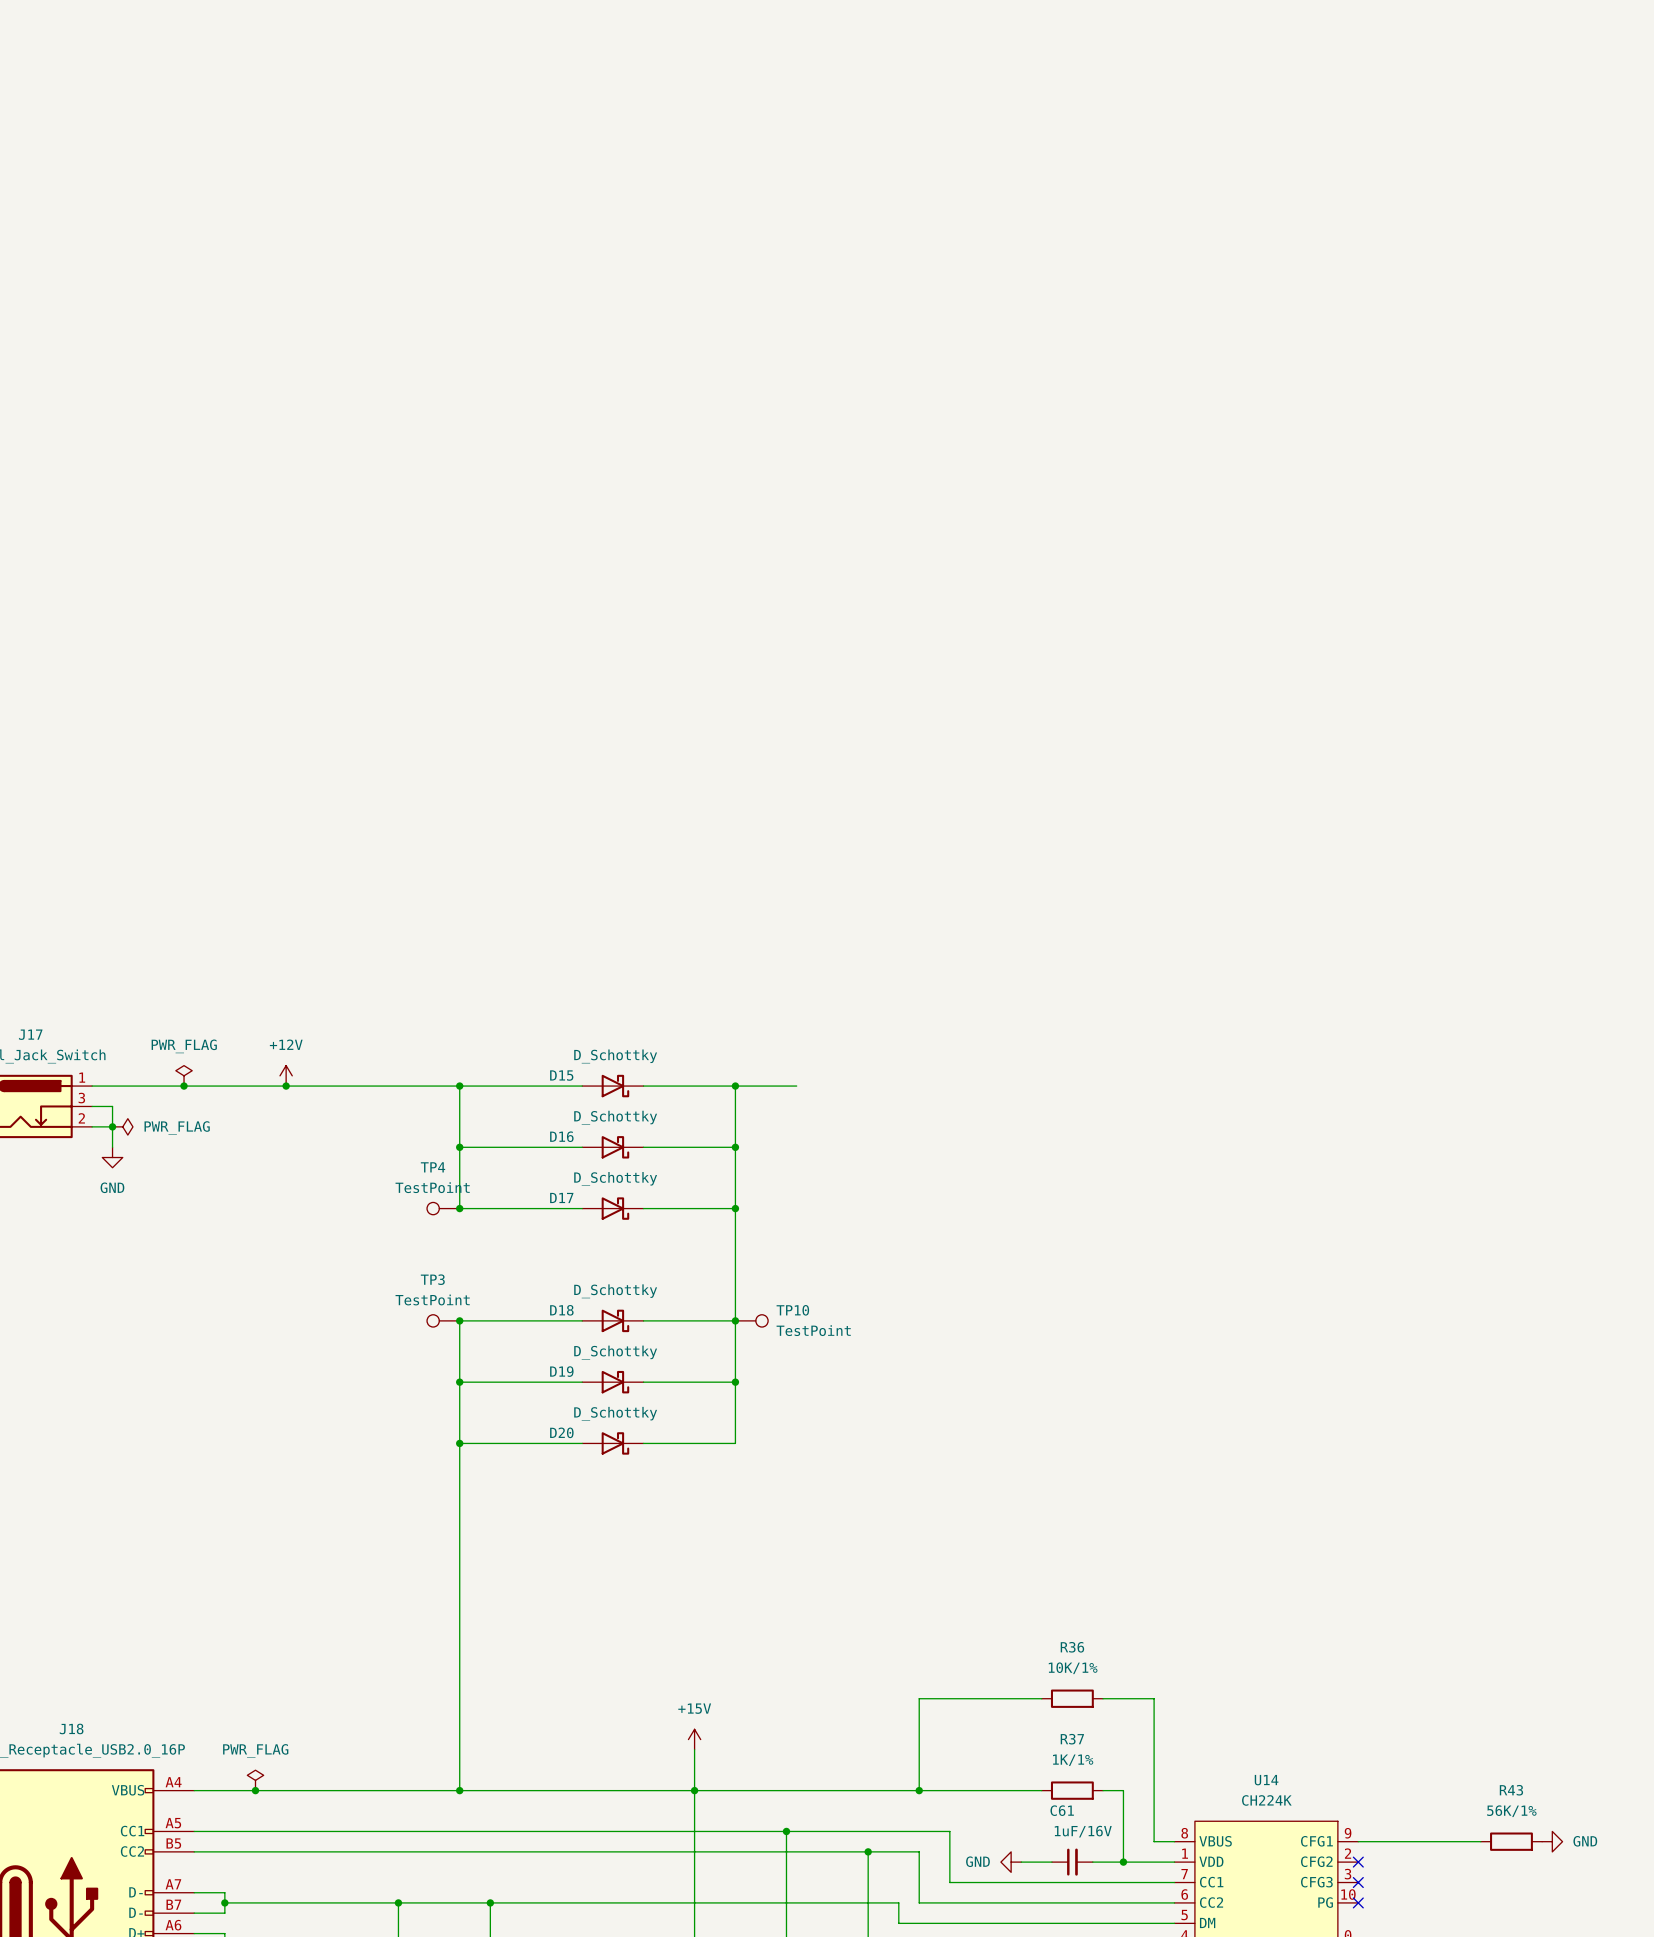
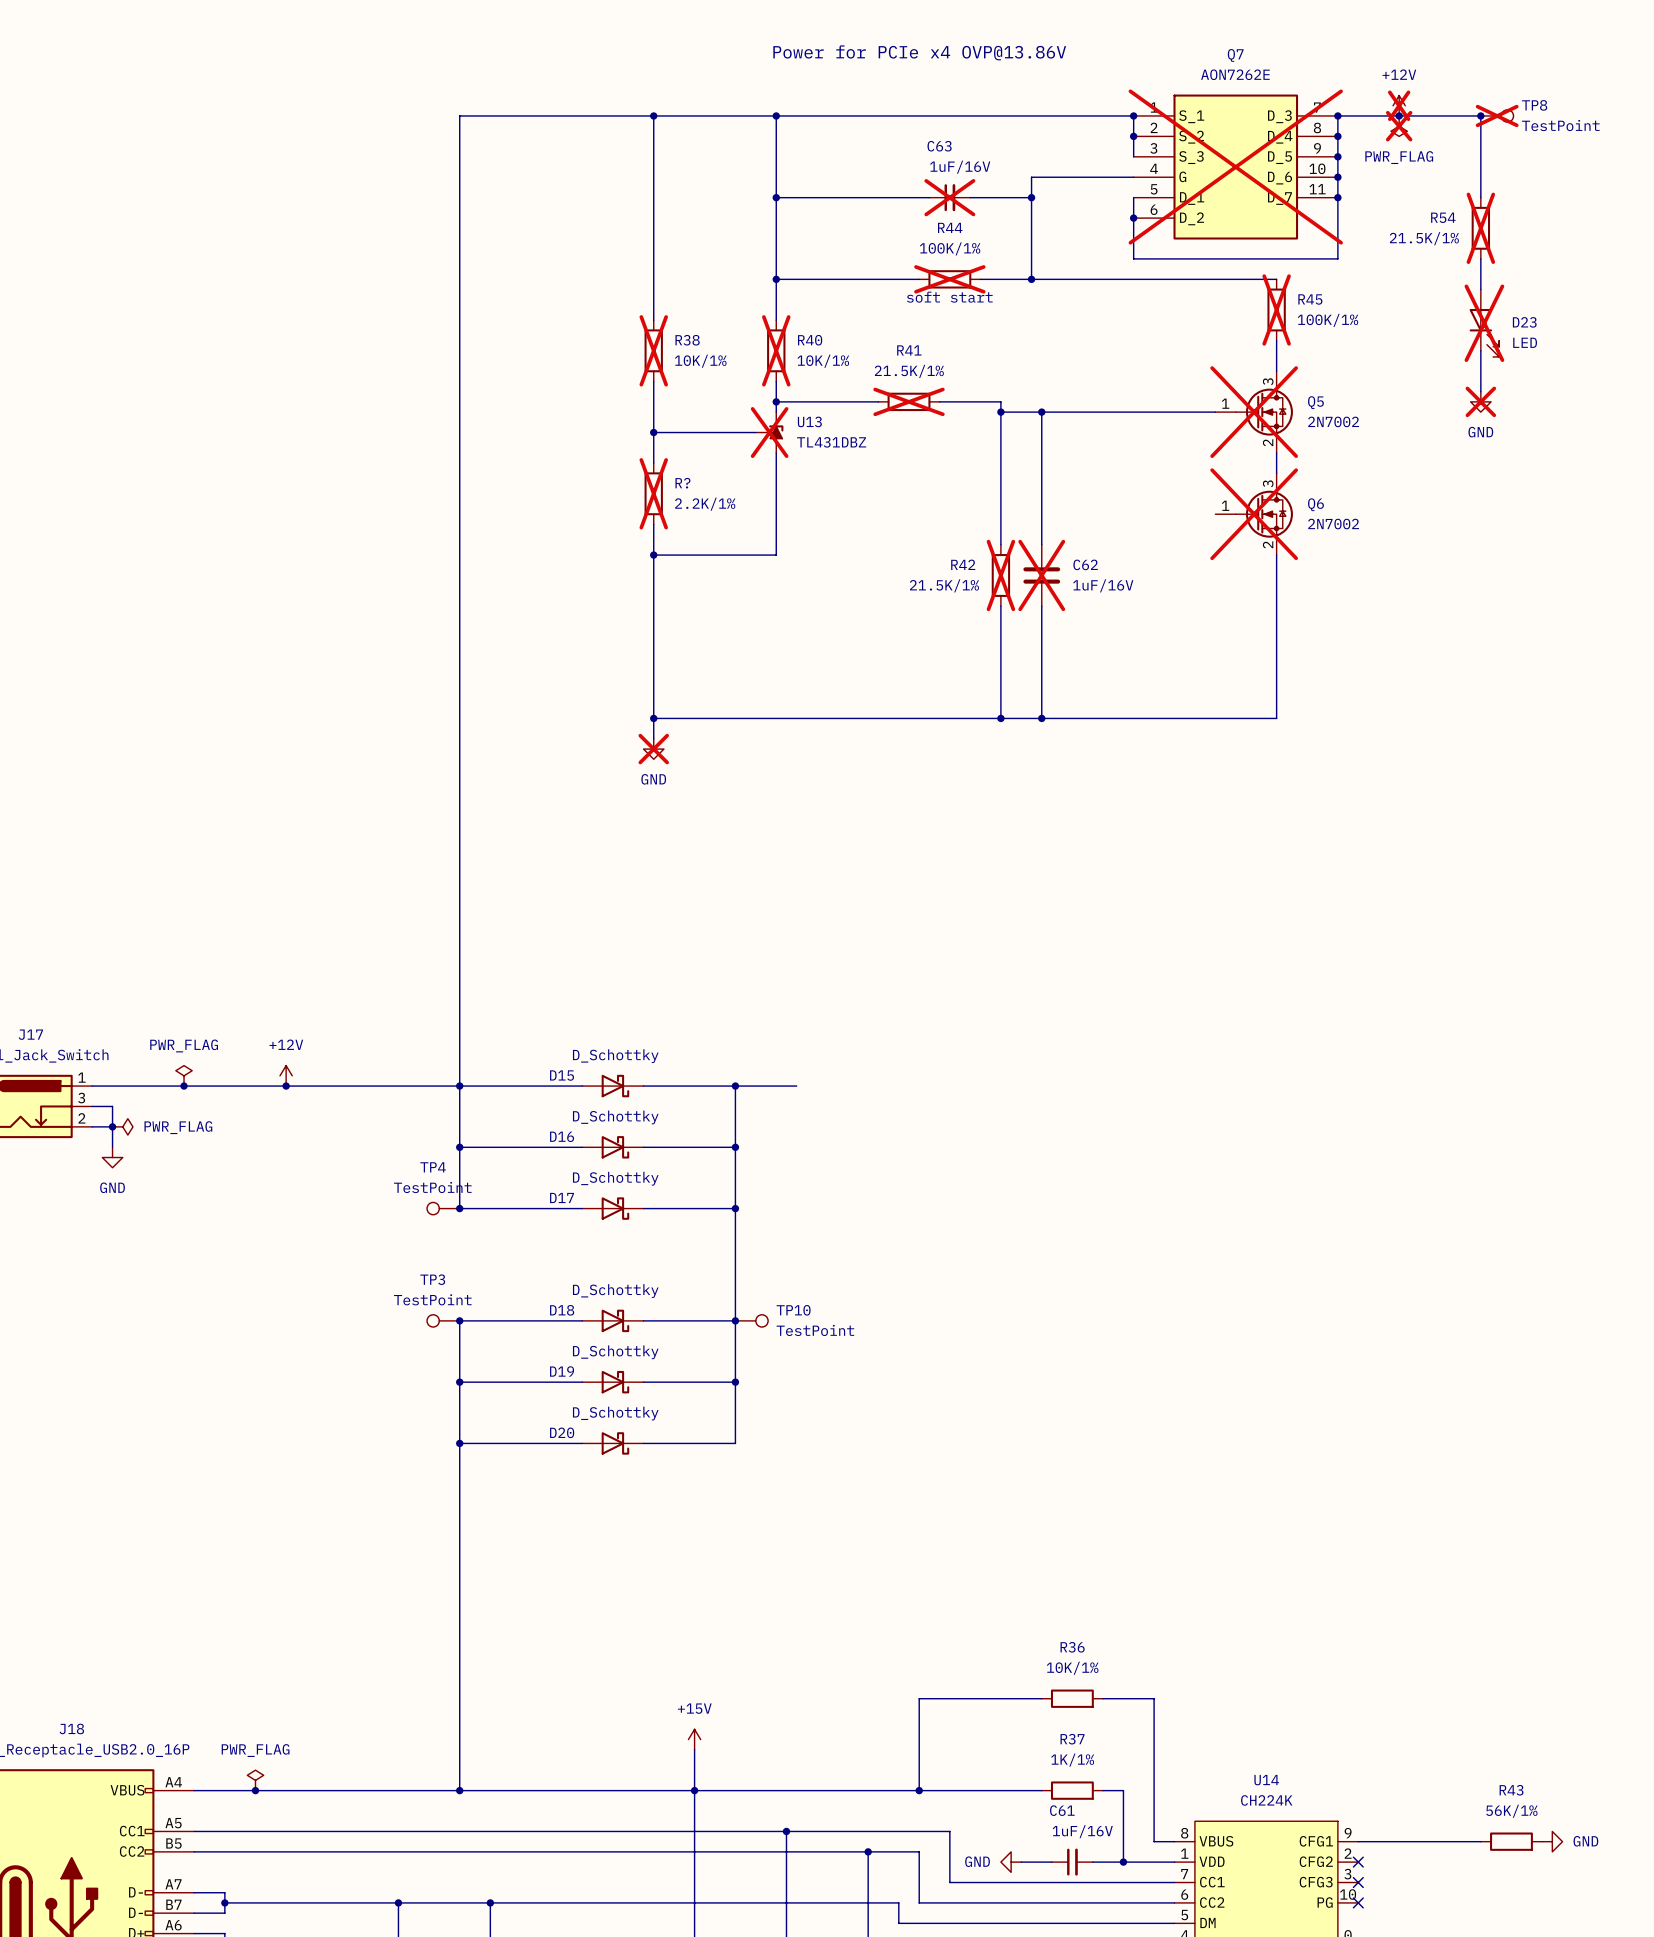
text: none -> Power for PCIe x4 OVP@13.86V (919, 52)
power symbol: none -> +12V (1399, 105)
wire: none -> (653, 115) (653, 320)
junction: none -> (653, 115)
wire: none -> (776, 115) (776, 320)
junction: none -> (776, 115)
junction: none -> (1133, 115)
junction: none -> (1337, 115)
junction: none -> (1399, 115)
junction: none -> (1480, 115)
TP8: none -> TestPoint (1497, 115)
power symbol: none -> PWR_FLAG (1399, 126)
junction: none -> (1133, 136)
junction: none -> (1337, 136)
wire: none -> (1133, 156) (1133, 115) (459, 115) (459, 1086)
junction: none -> (1337, 156)
Q7: none -> AON7262E (1235, 167)
wire: none -> (1133, 177) (1031, 177) (1031, 279)
junction: none -> (1337, 177)
wire: none -> (776, 197) (929, 197)
junction: none -> (776, 197)
C63: none -> 1uF/16V (949, 197)
wire: none -> (970, 197) (1031, 197)
junction: none -> (1031, 197)
wire: none -> (1133, 197) (1133, 258) (1337, 258) (1337, 115) (1480, 115) (1480, 197)
junction: none -> (1337, 197)
junction: none -> (1133, 218)
R54: none -> 21.5K/1% (1480, 228)
wire: none -> (1480, 258) (1480, 289)
wire: none -> (776, 279) (919, 279)
junction: none -> (776, 279)
R44: none -> 100K/1% (949, 279)
wire: none -> (980, 279) (1276, 279)
junction: none -> (1031, 279)
text: none -> soft start (949, 297)
R45: none -> 100K/1% (1276, 309)
D23: none -> LED (1484, 323)
wire: none -> (1276, 340) (1276, 371)
R38: none -> 10K/1% (653, 350)
R40: none -> 10K/1% (776, 350)
wire: none -> (1480, 350) (1480, 391)
wire: none -> (653, 381) (653, 463)
wire: none -> (776, 381) (776, 412)
wire: none -> (776, 401) (878, 401)
junction: none -> (776, 401)
R41: none -> 21.5K/1% (909, 401)
wire: none -> (939, 401) (1000, 401) (1000, 544)
power symbol: none -> GND (1480, 401)
wire: none -> (1000, 412) (1215, 412)
junction: none -> (1000, 412)
wire: none -> (1041, 412) (1041, 544)
junction: none -> (1041, 412)
Q5: none -> 2N7002 (1254, 412)
wire: none -> (653, 432) (755, 432)
junction: none -> (653, 432)
U13: none -> TL431DBZ (769, 432)
wire: none -> (776, 452) (776, 555) (653, 555)
wire: none -> (1276, 452) (1276, 473)
R?: none -> 2.2K/1% (653, 493)
Q6: none -> 2N7002 (1254, 514)
wire: none -> (653, 524) (653, 738)
junction: none -> (653, 555)
wire: none -> (1276, 555) (1276, 718) (653, 718)
R42: none -> 21.5K/1% (1000, 575)
C62: none -> 1uF/16V (1041, 575)
wire: none -> (1000, 606) (1000, 718)
wire: none -> (1041, 606) (1041, 718)
junction: none -> (653, 718)
junction: none -> (1000, 718)
junction: none -> (1041, 718)
power symbol: none -> GND (653, 749)

